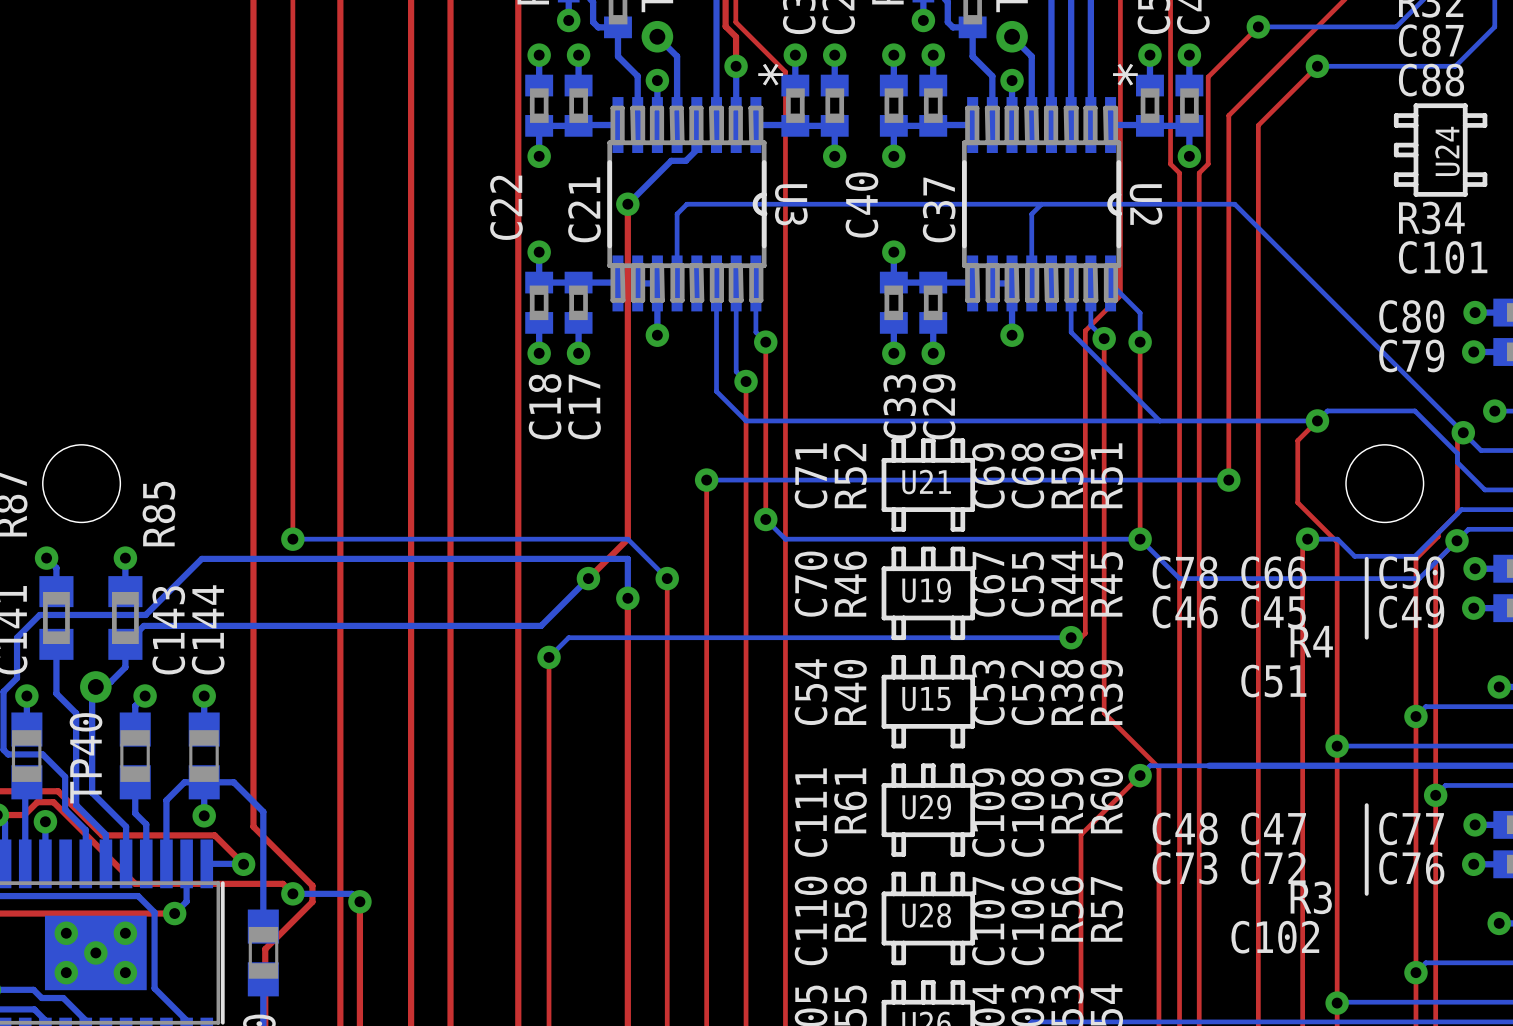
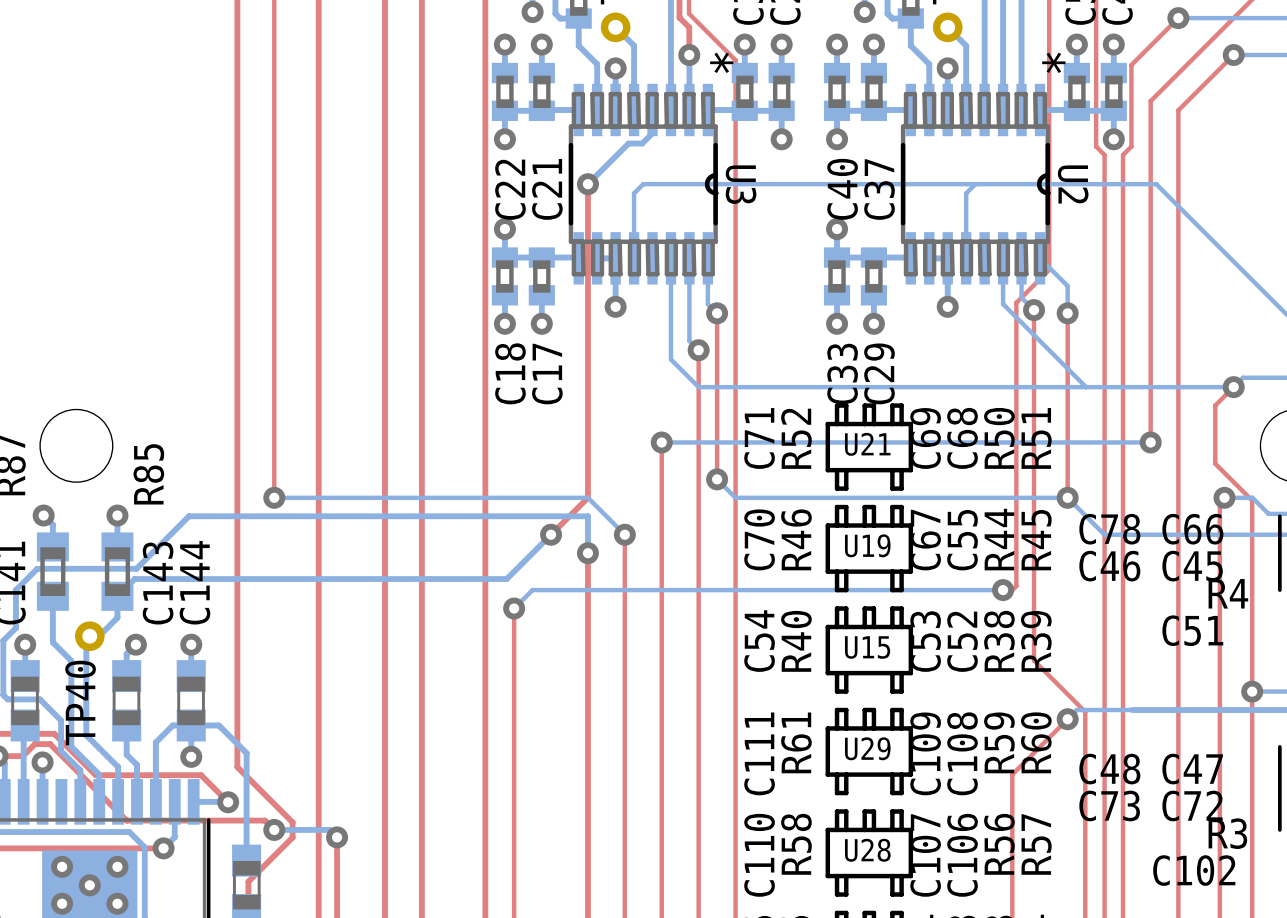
C40 name position: C40 (861, 205) -> C40 (842, 189)
C22 name position: C22 (506, 207) -> C22 (510, 189)

